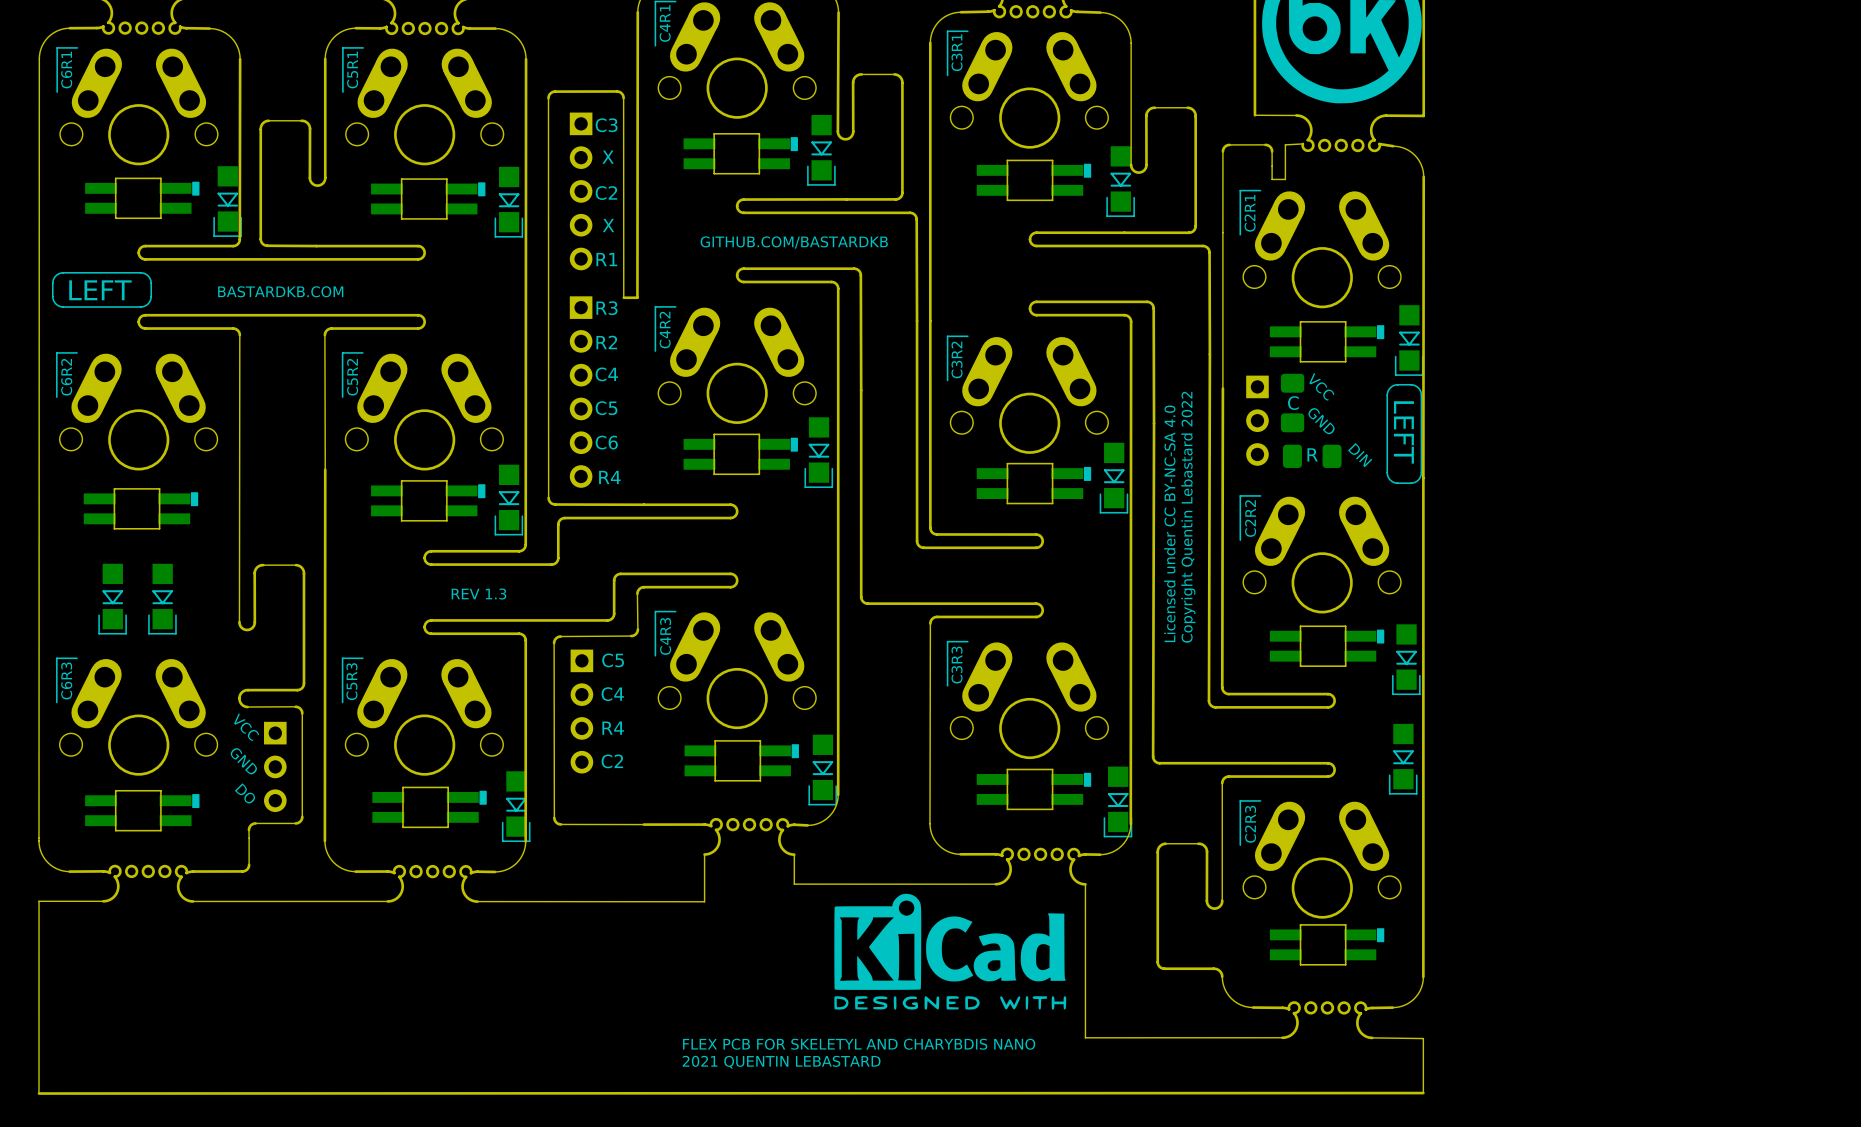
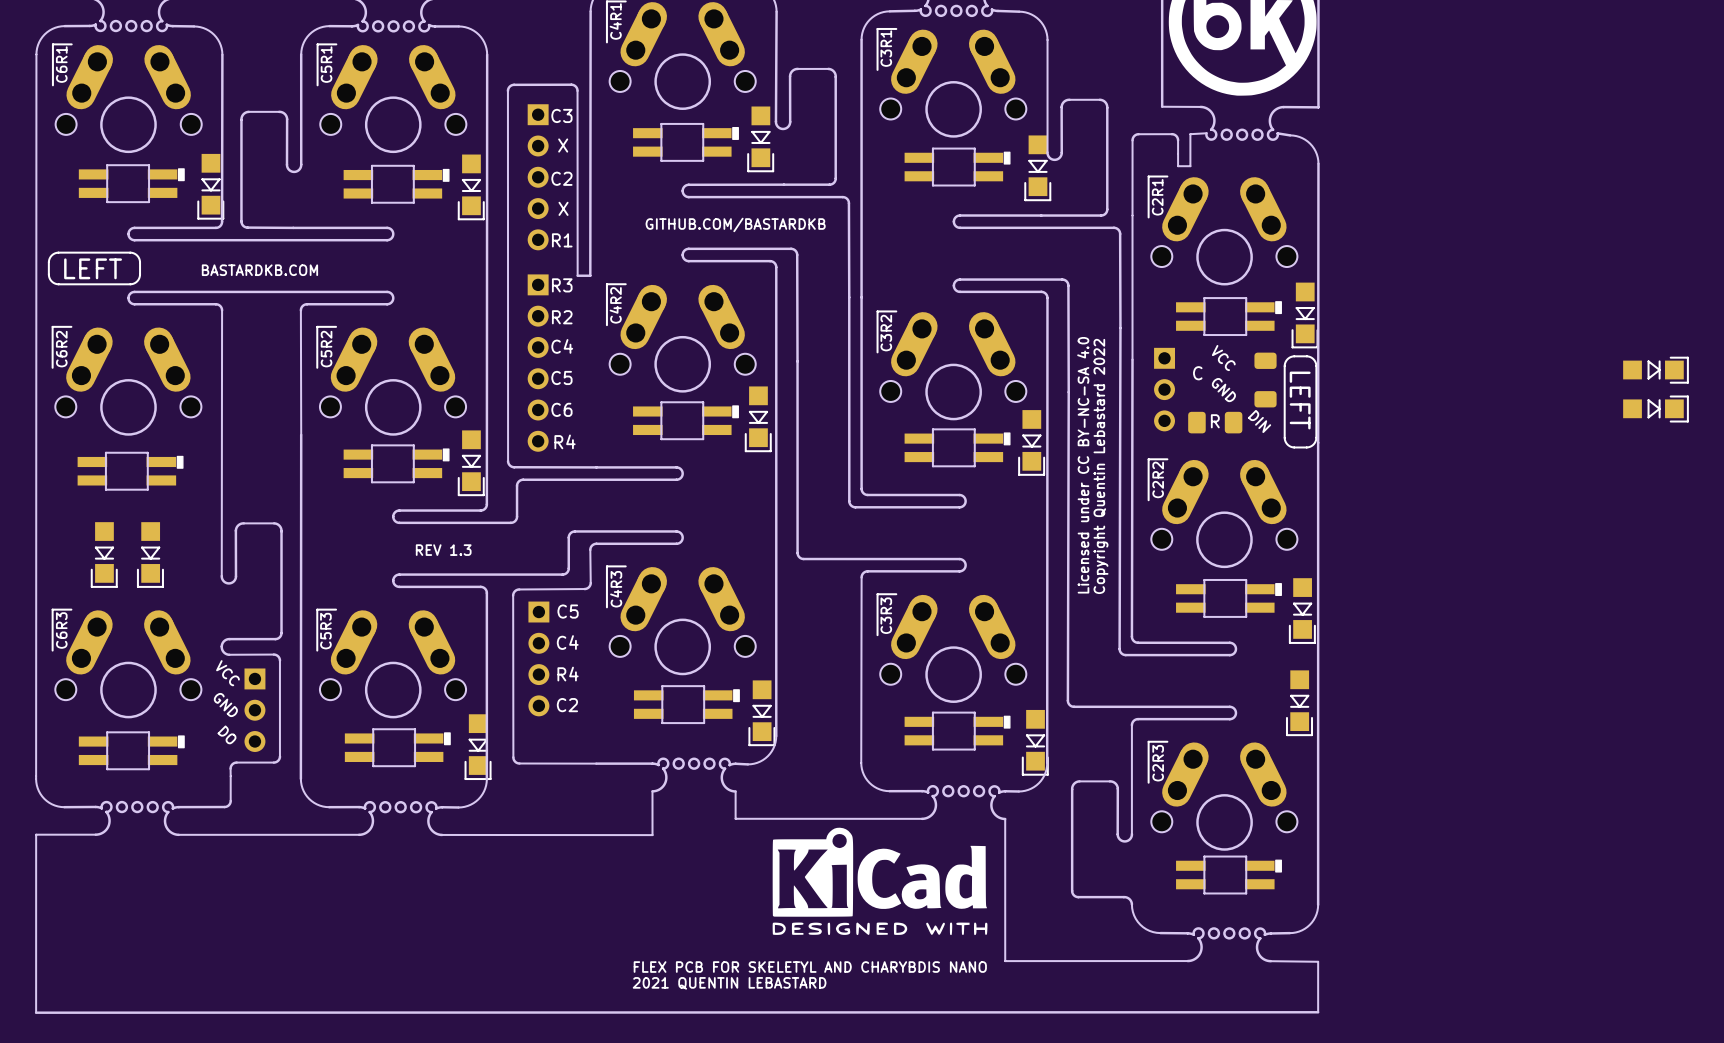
part: none -> (1655, 370)
part: (1292, 403) -> none
part: none -> (1265, 380)
part: none -> (1655, 409)

